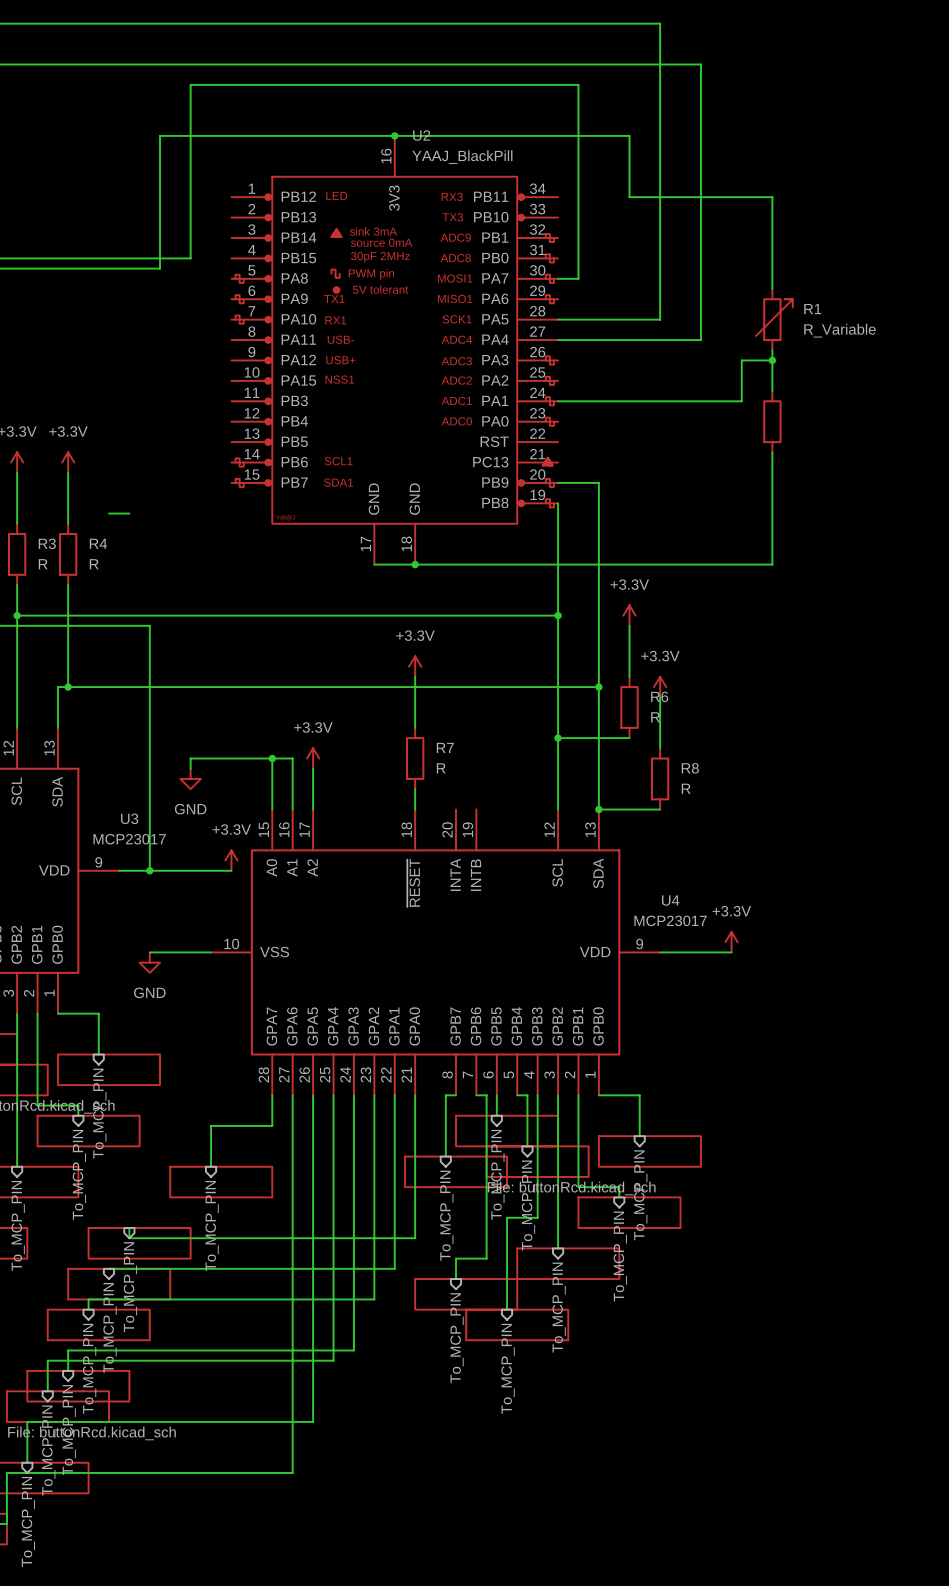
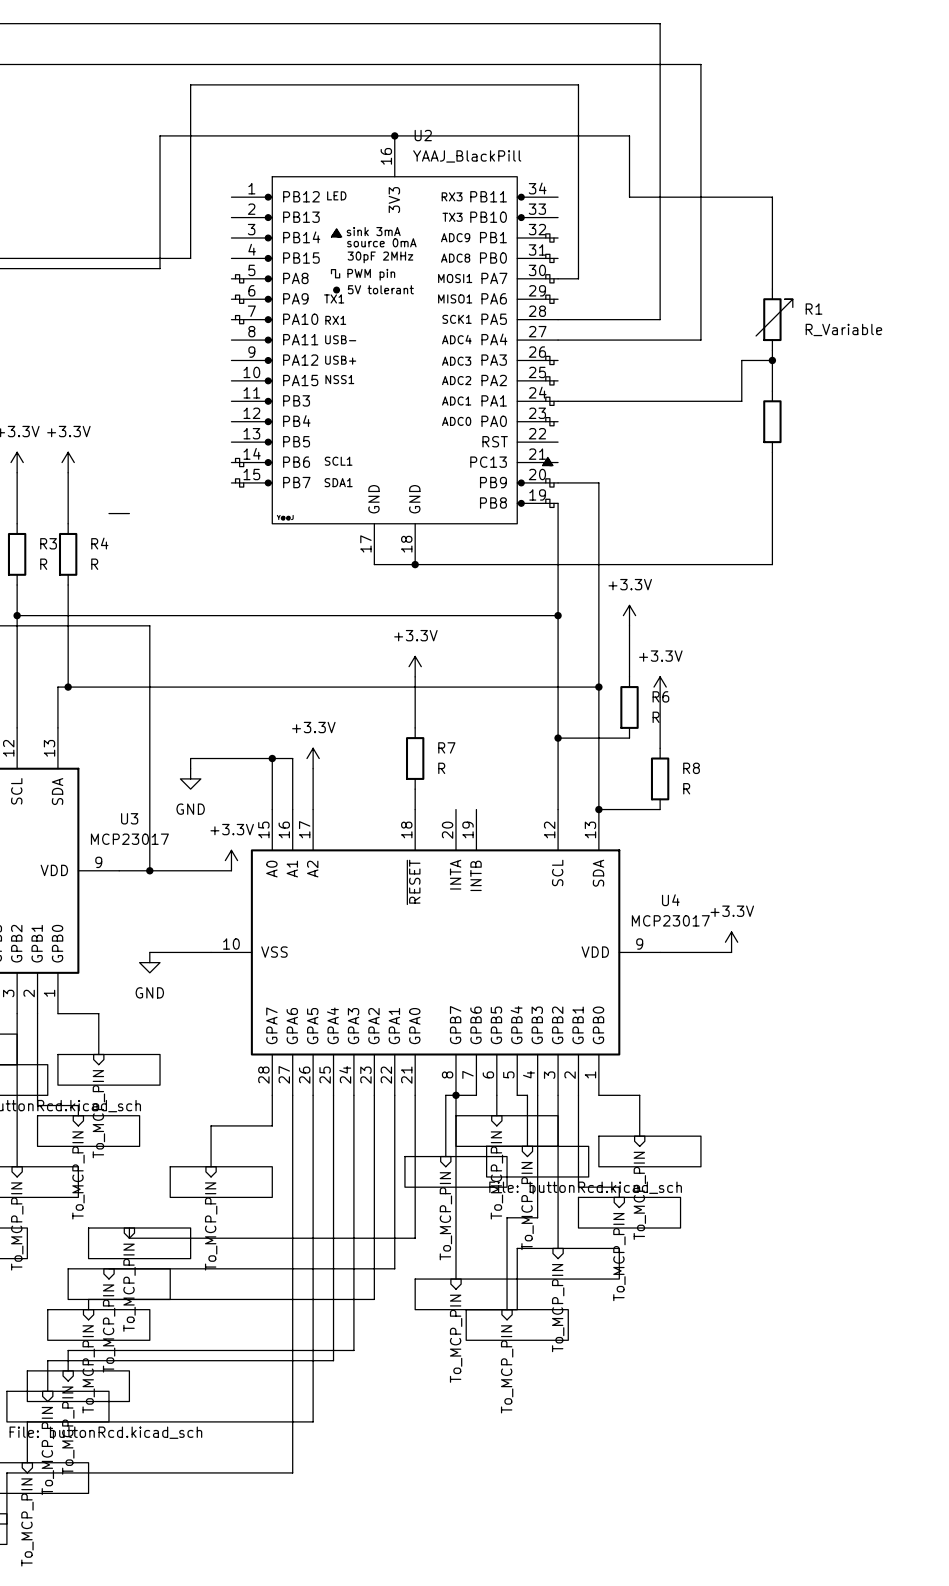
junction: none -> (456, 1095)
wire: (476, 1095) (486, 1095) (486, 1258) (456, 1258) -> (476, 1095) (456, 1095) (456, 1258)

